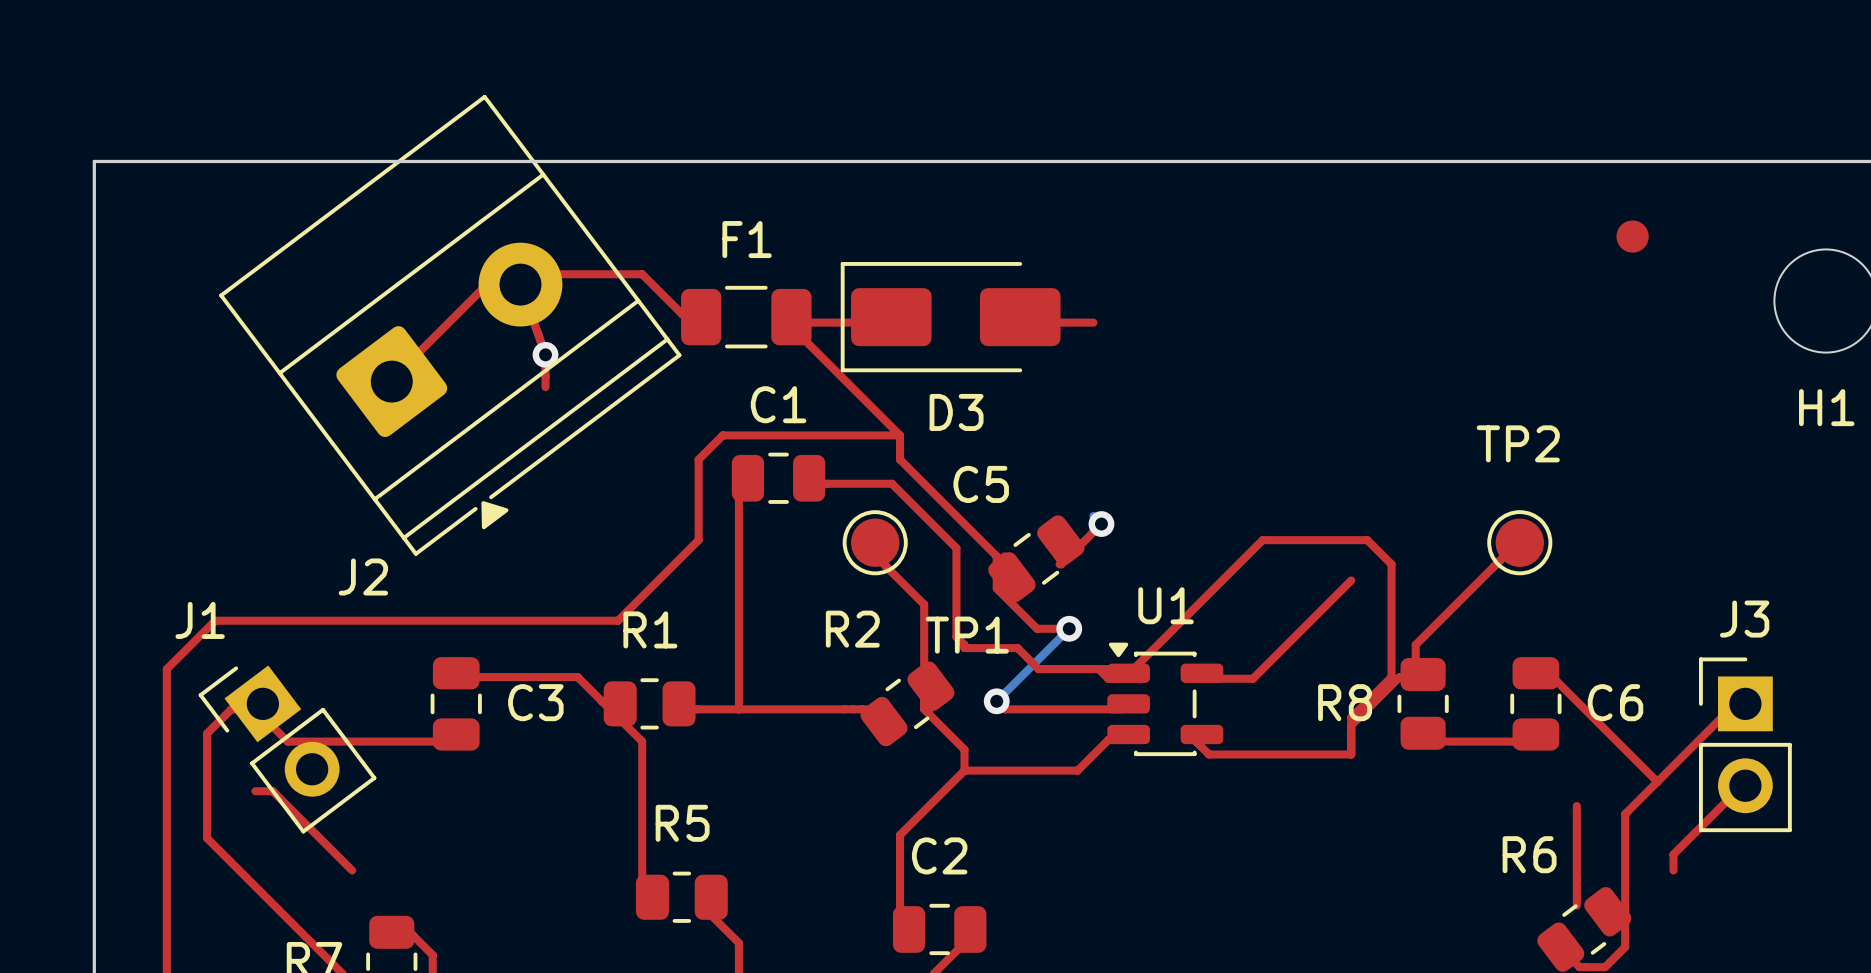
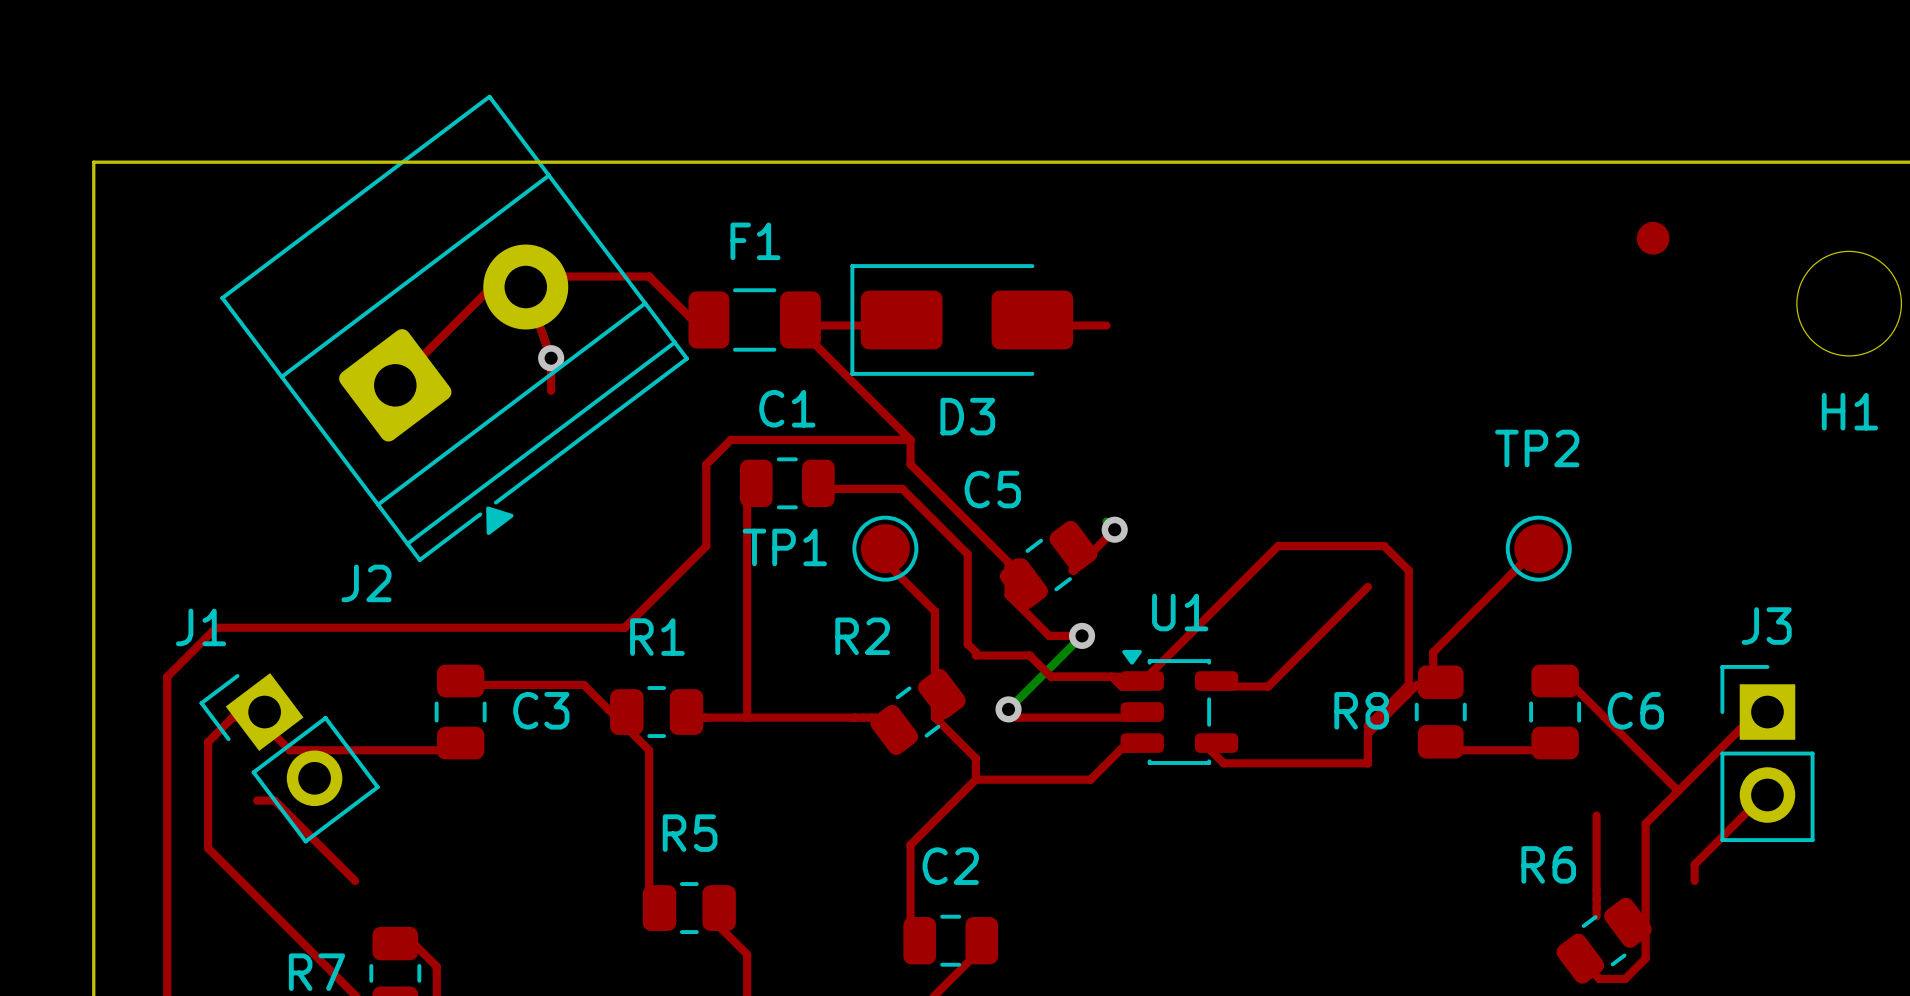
TP1 name position: TP1 (967, 635) -> TP1 (784, 547)

